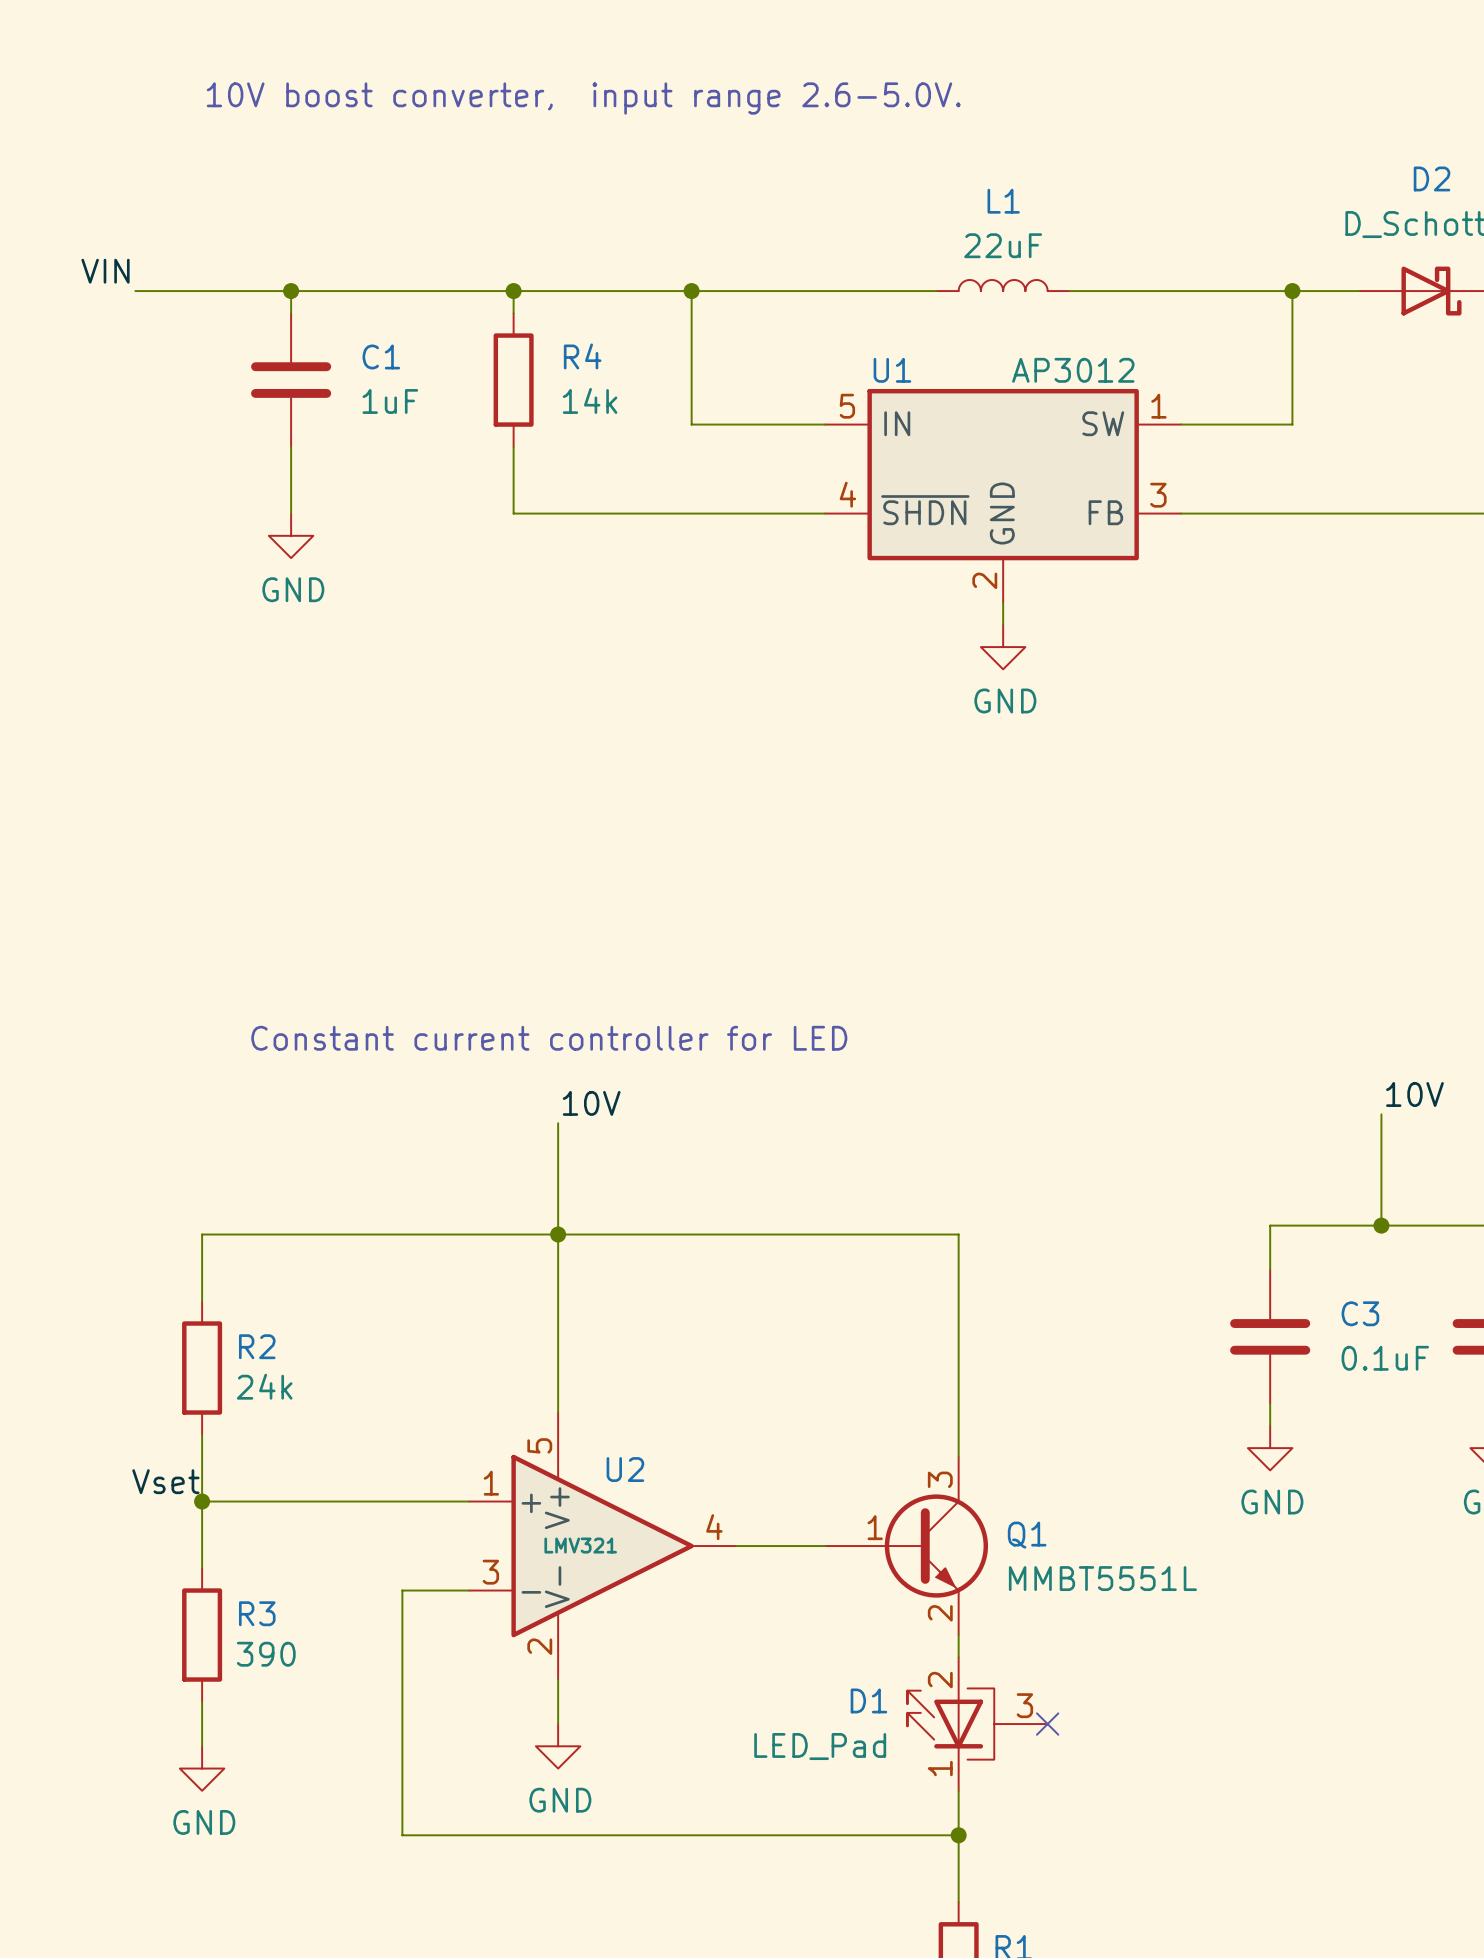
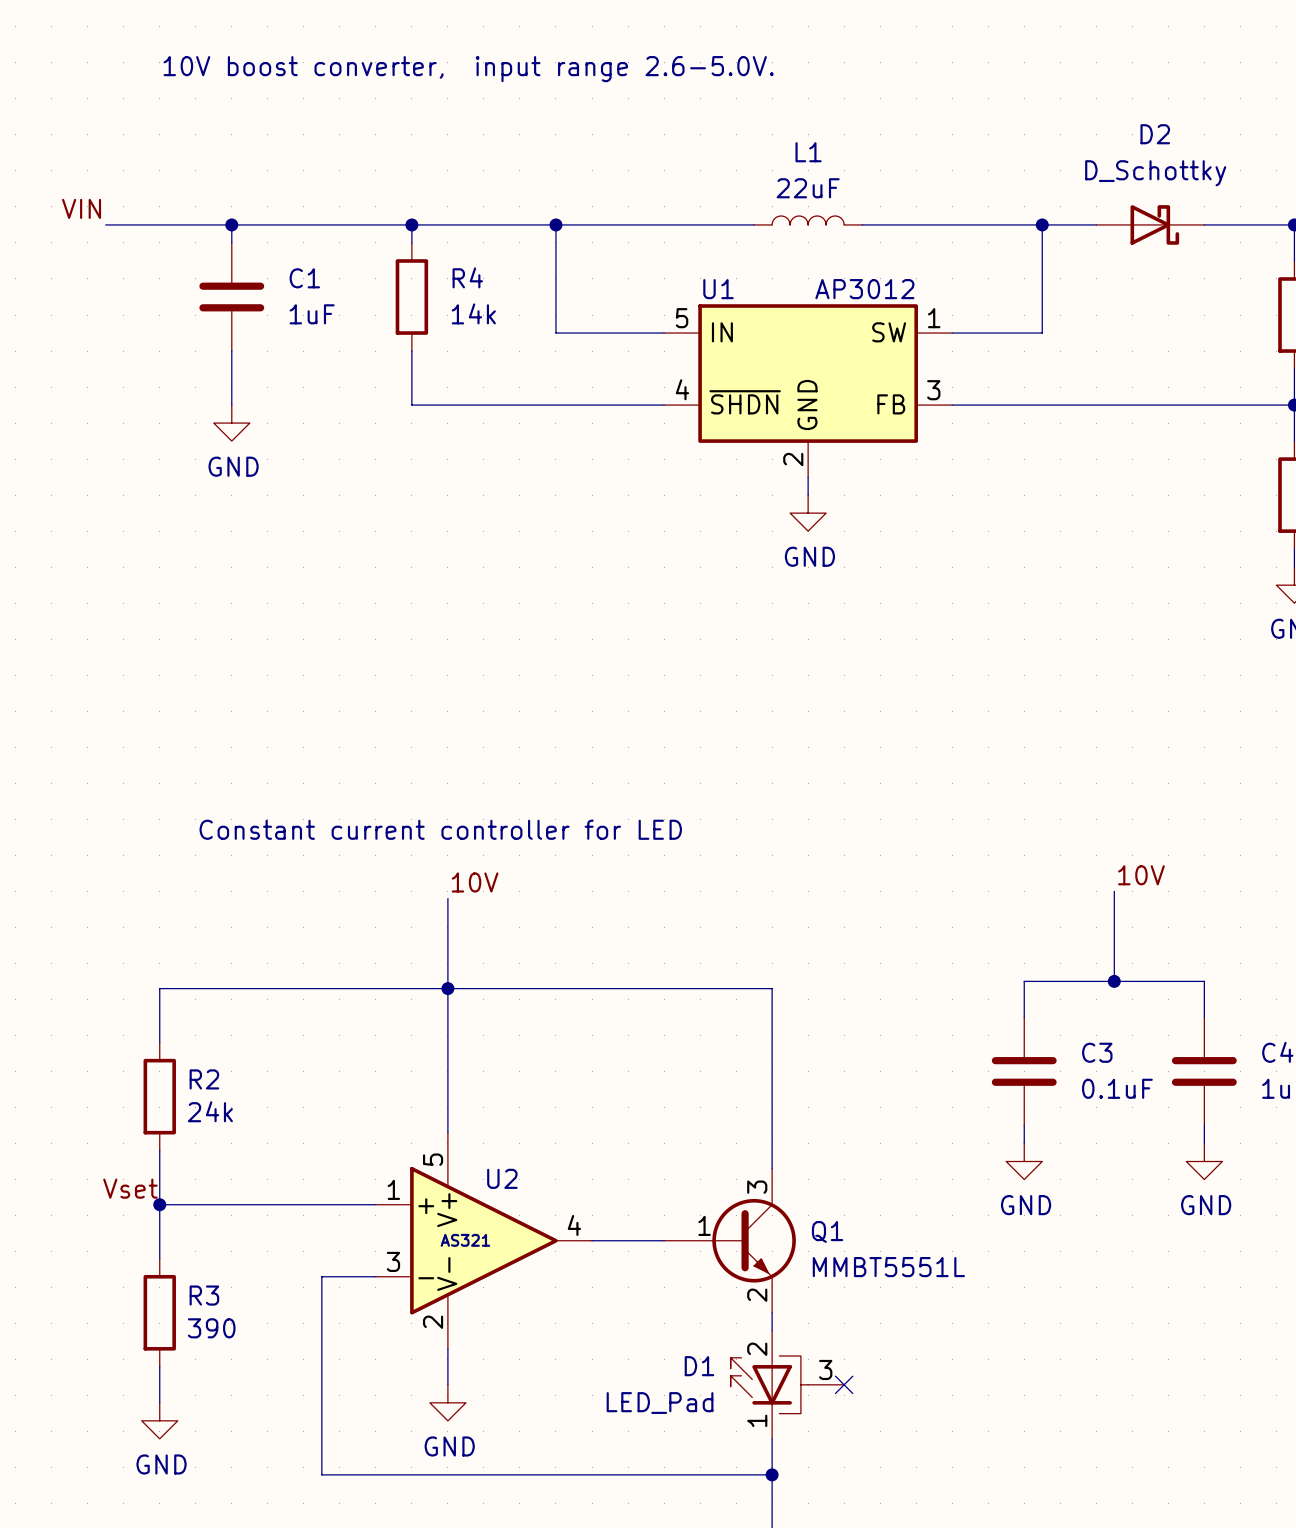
U2 value: LMV321 (580, 1545) -> AS321 (465, 1240)

